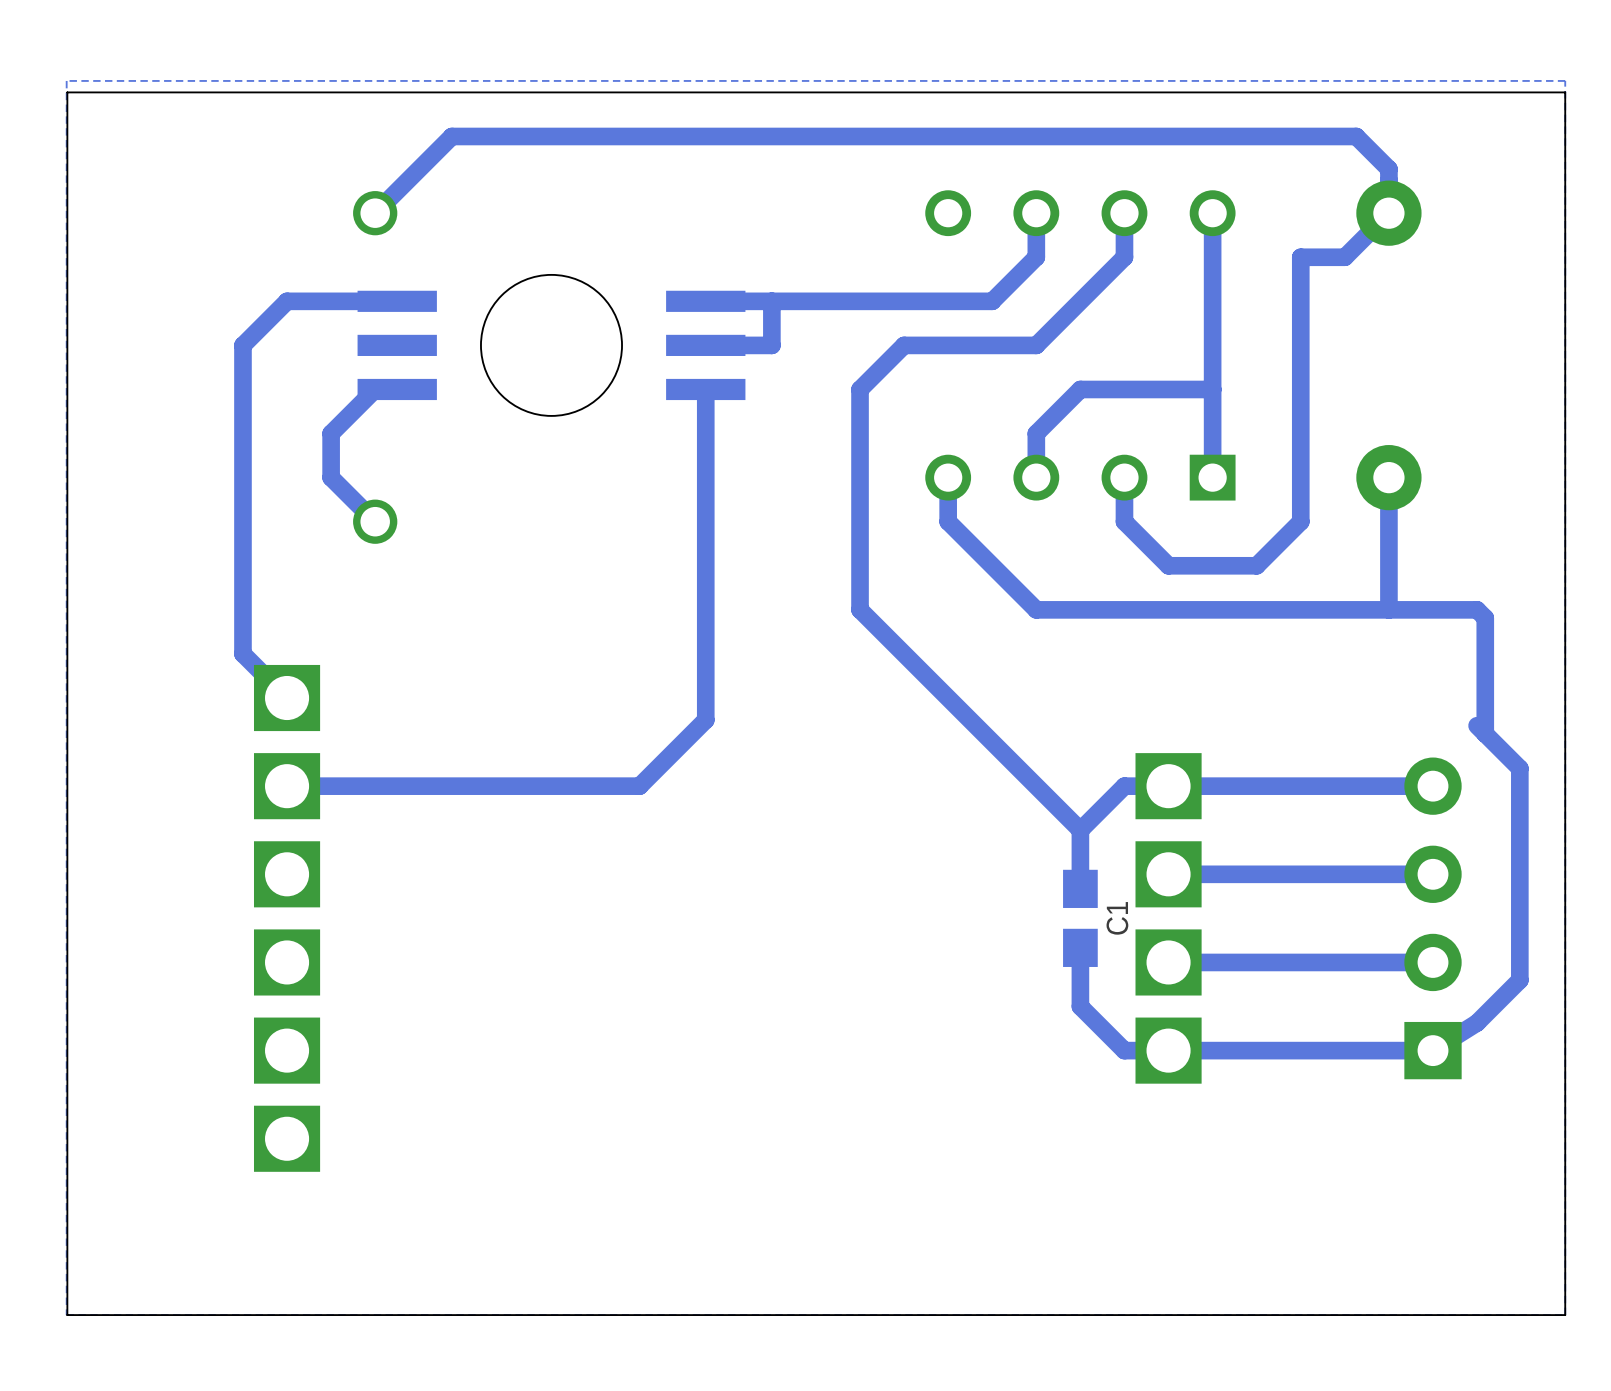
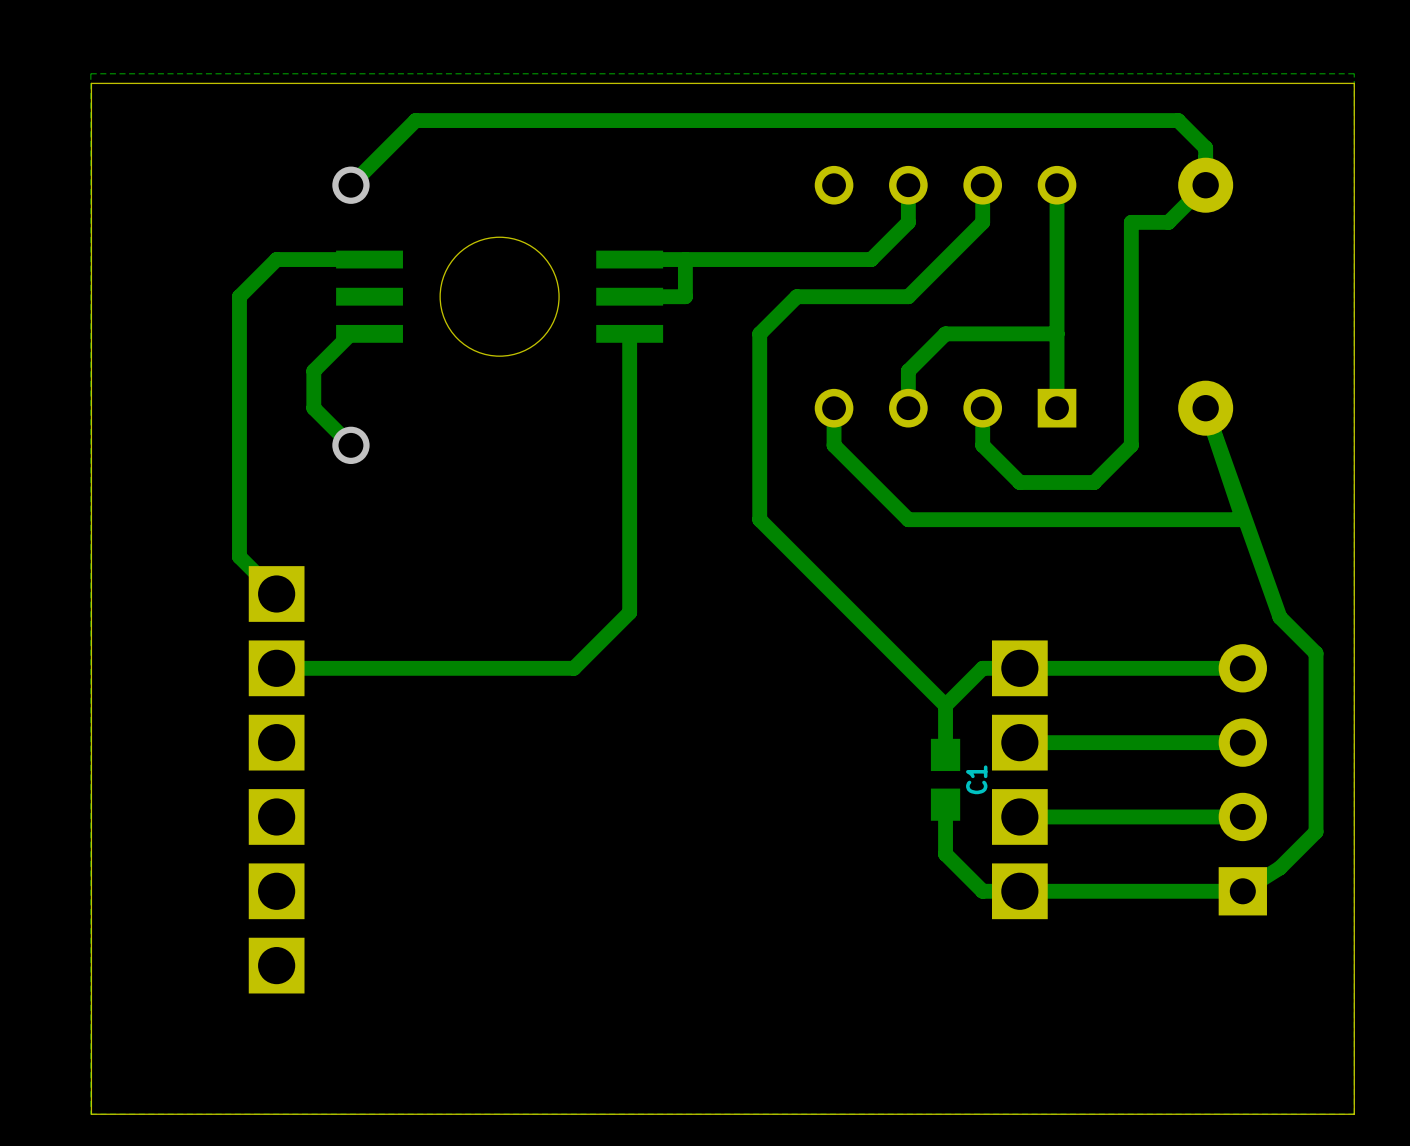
track: (1388, 477) (1388, 609) -> none
track: (1433, 609) (1477, 609) (1485, 618) (1485, 733) -> (1242, 519) (1205, 408) (1279, 617)

